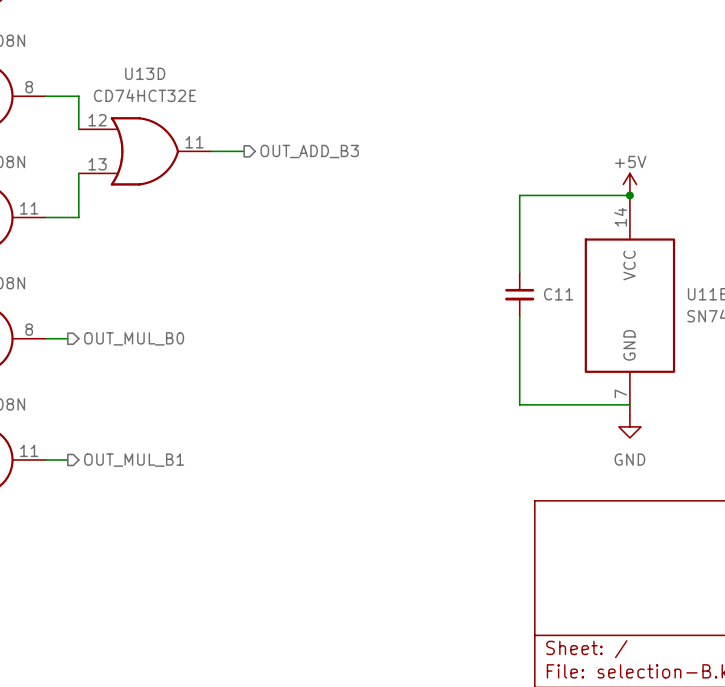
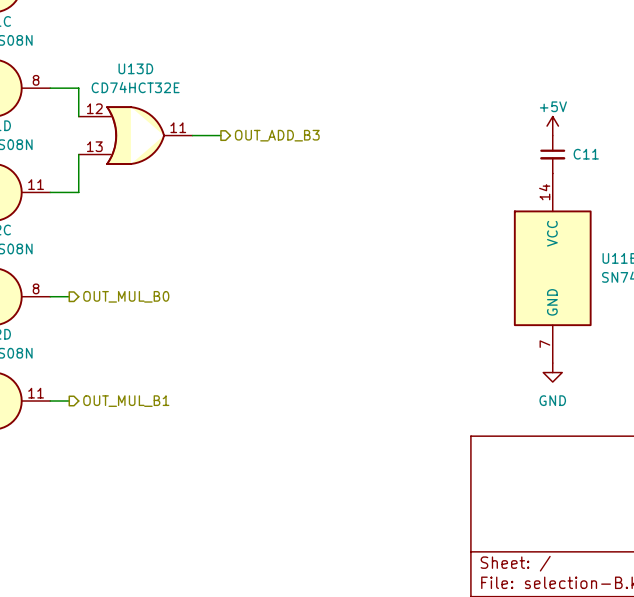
power symbol position: +5V (629, 184) -> +5V (552, 126)
wire: (629, 195) (519, 195) (519, 272) -> none
junction: (629, 195) -> none
C11 position: (519, 294) -> (552, 154)
wire: (519, 316) (519, 404) (629, 404) -> none

